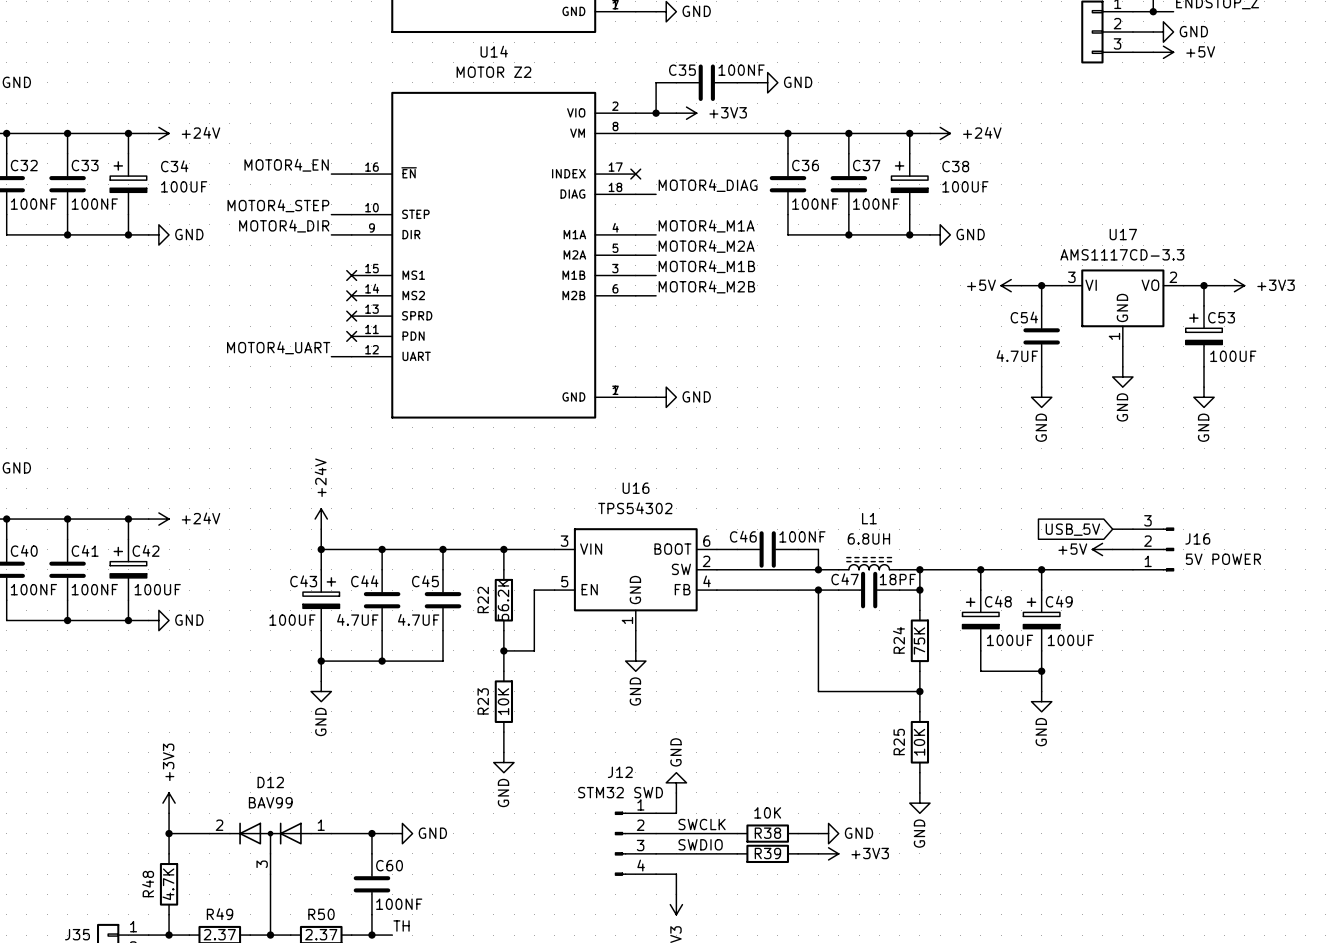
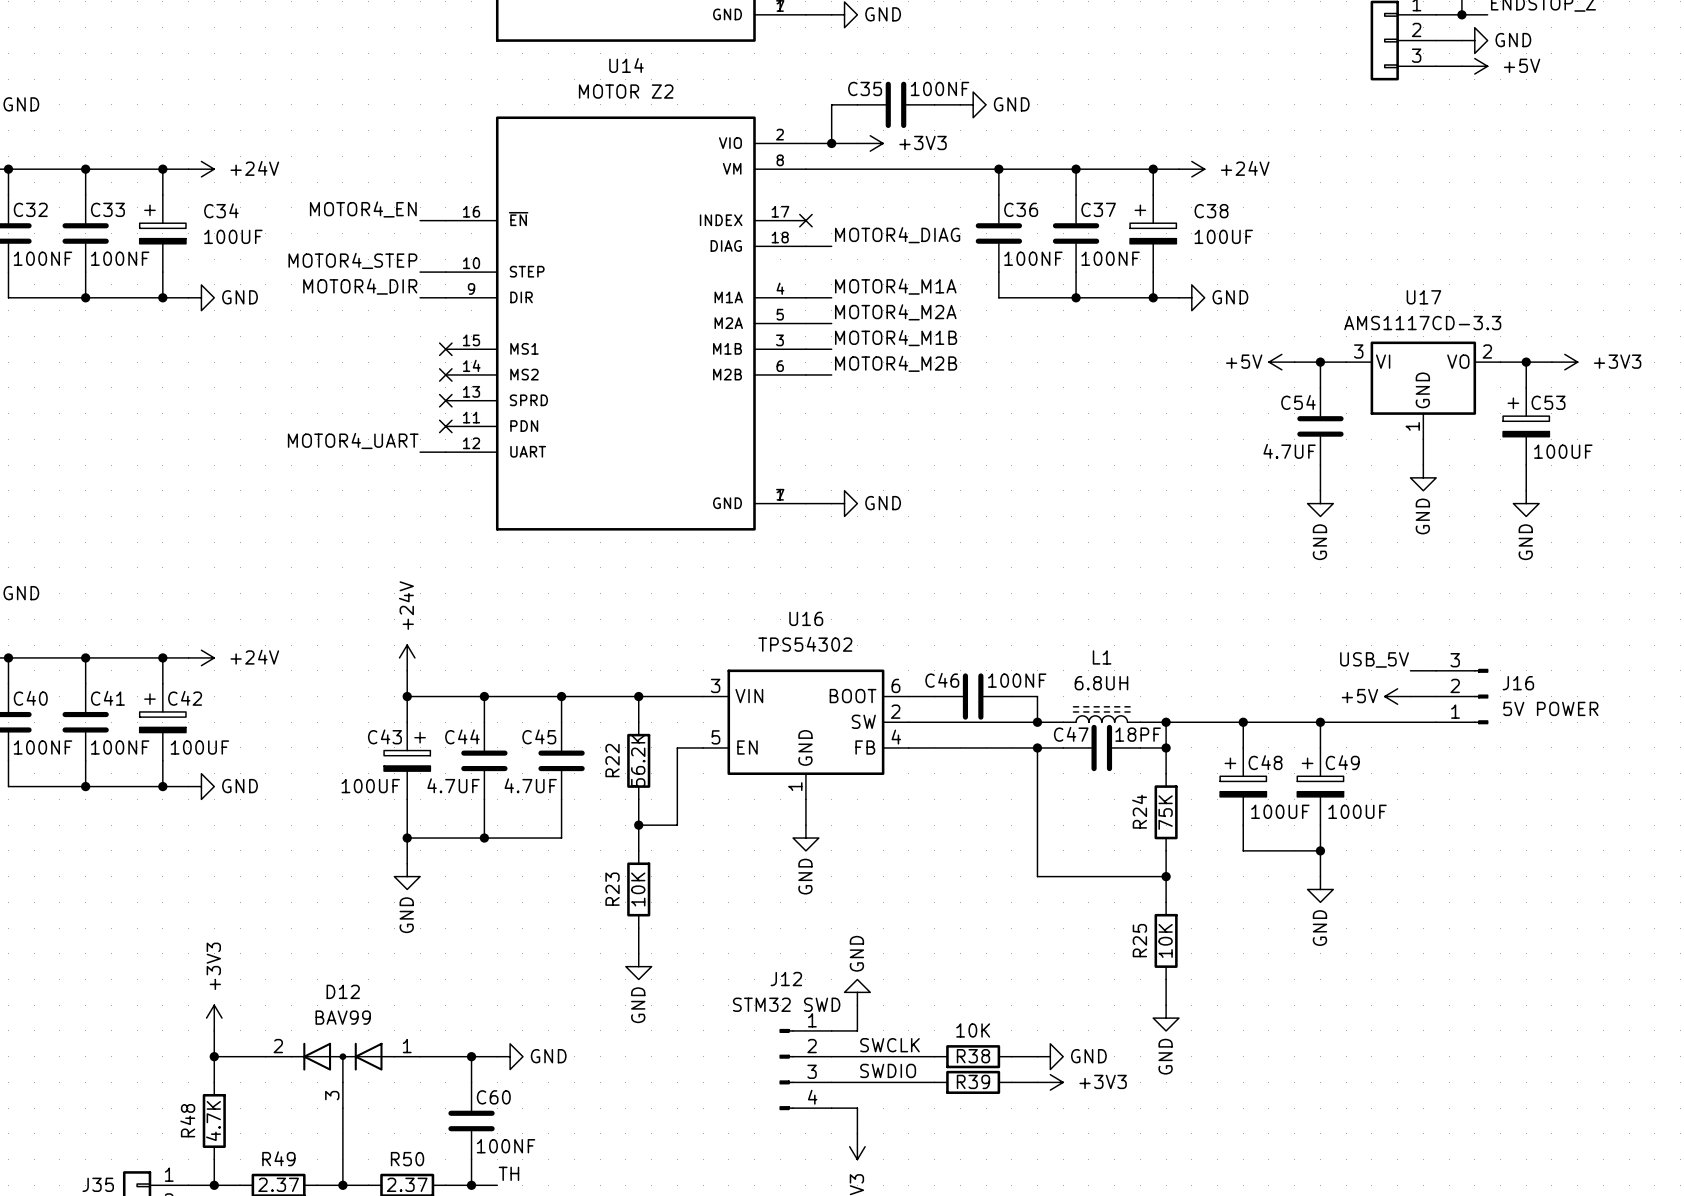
label: none -> USB_5V (1374, 659)
global label: USB_5V (1072, 529) -> none

